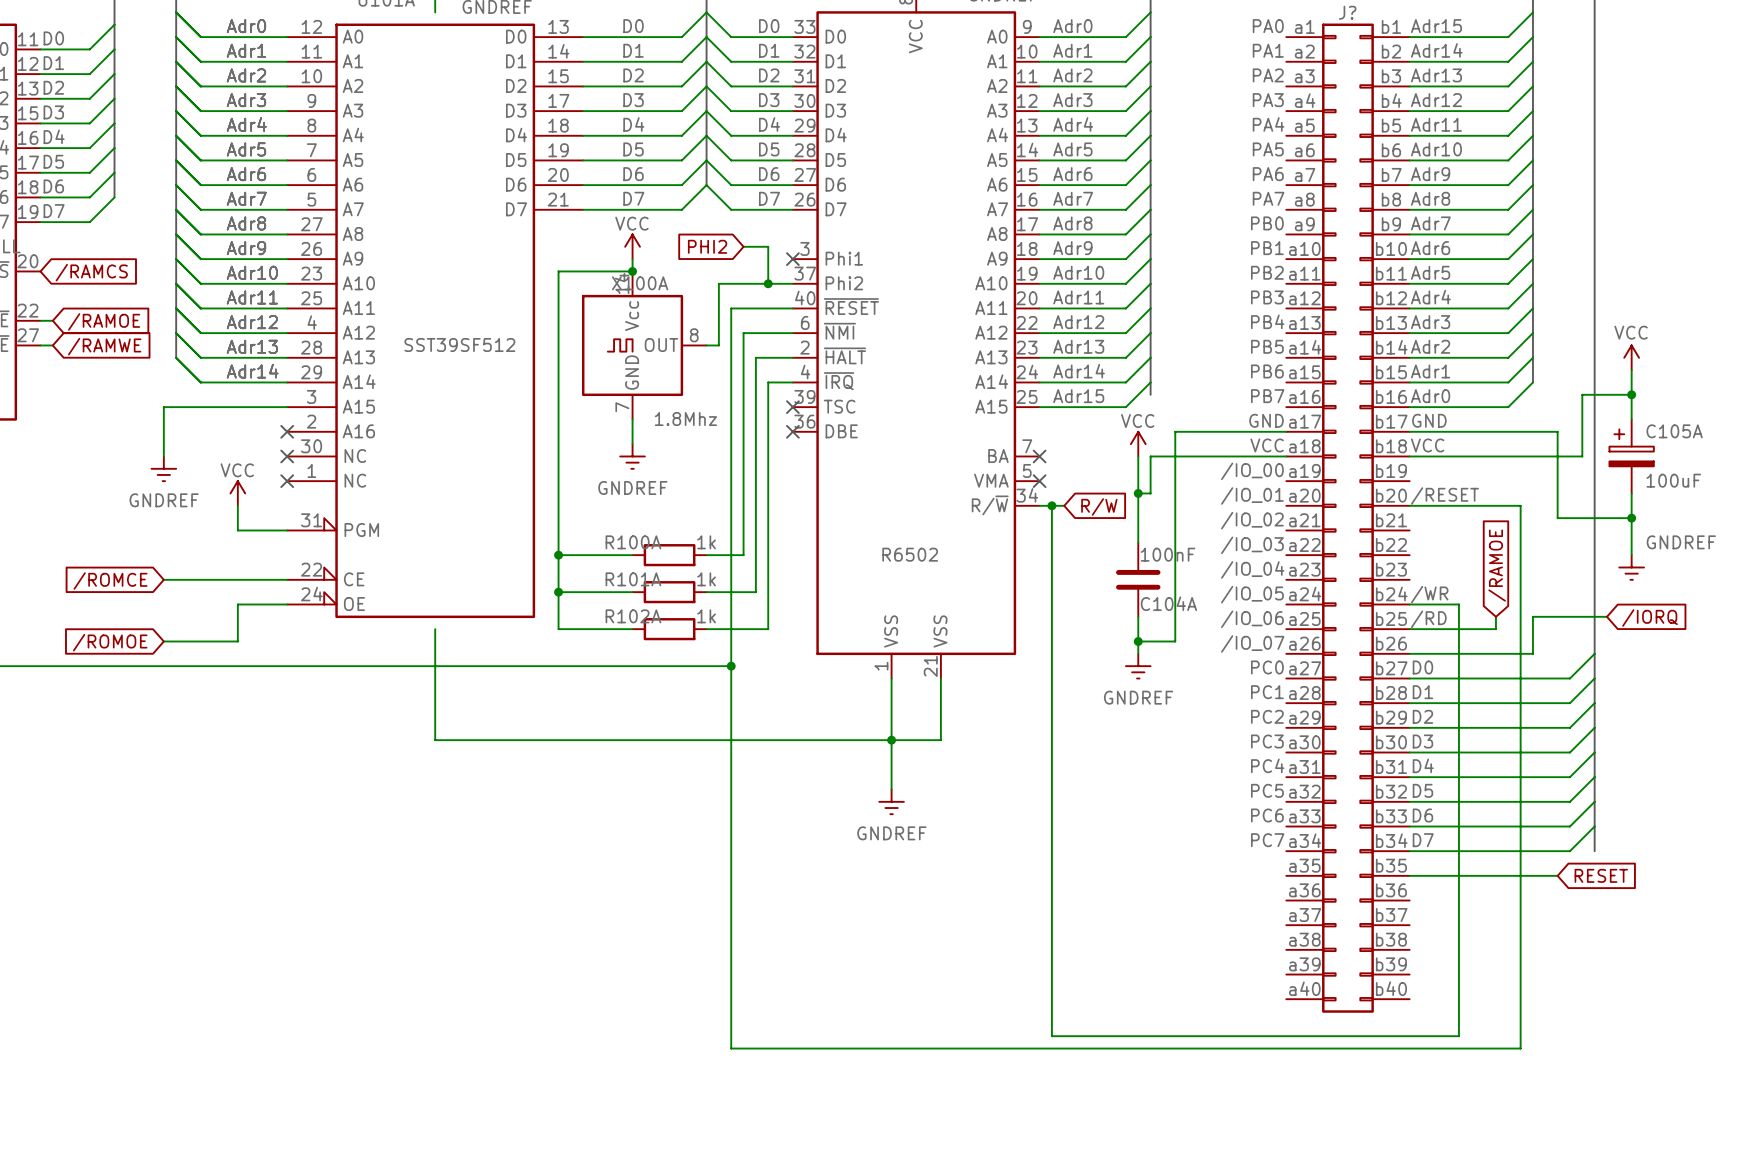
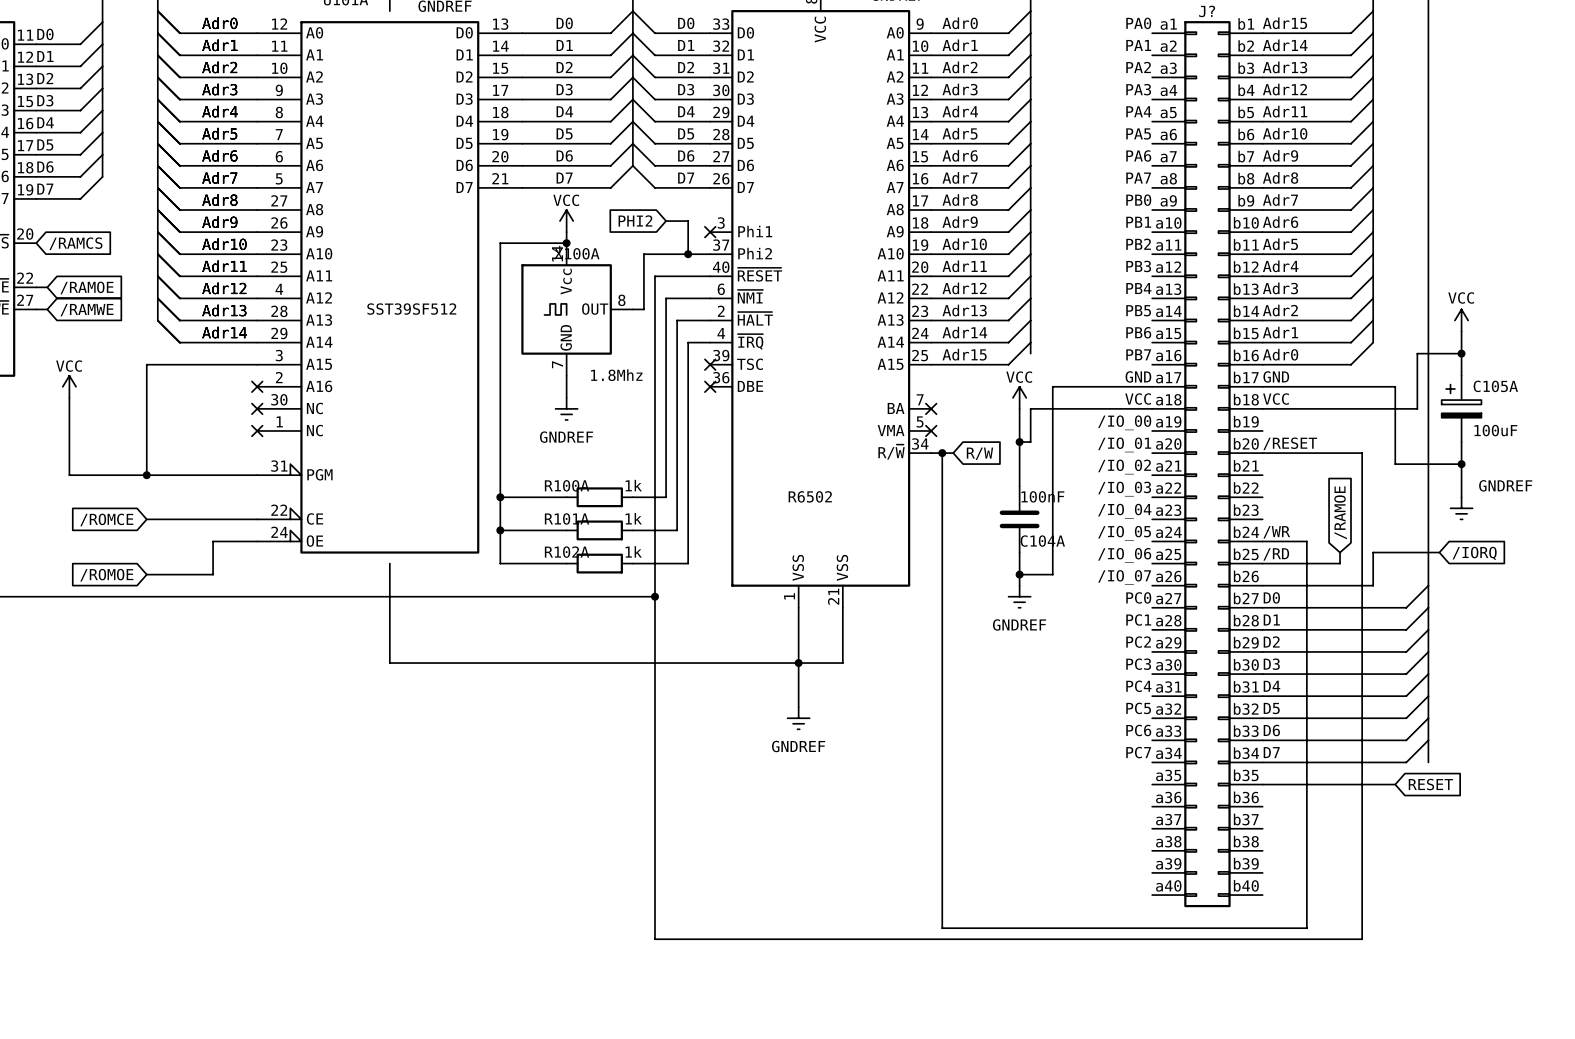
wire: none -> (146, 408) (146, 475)
power symbol: GNDREF (163, 468) -> none
power symbol position: VCC (237, 493) -> VCC (69, 386)
wire: (237, 505) (237, 530) -> (69, 397) (69, 475) (213, 475)
junction: none -> (146, 475)

